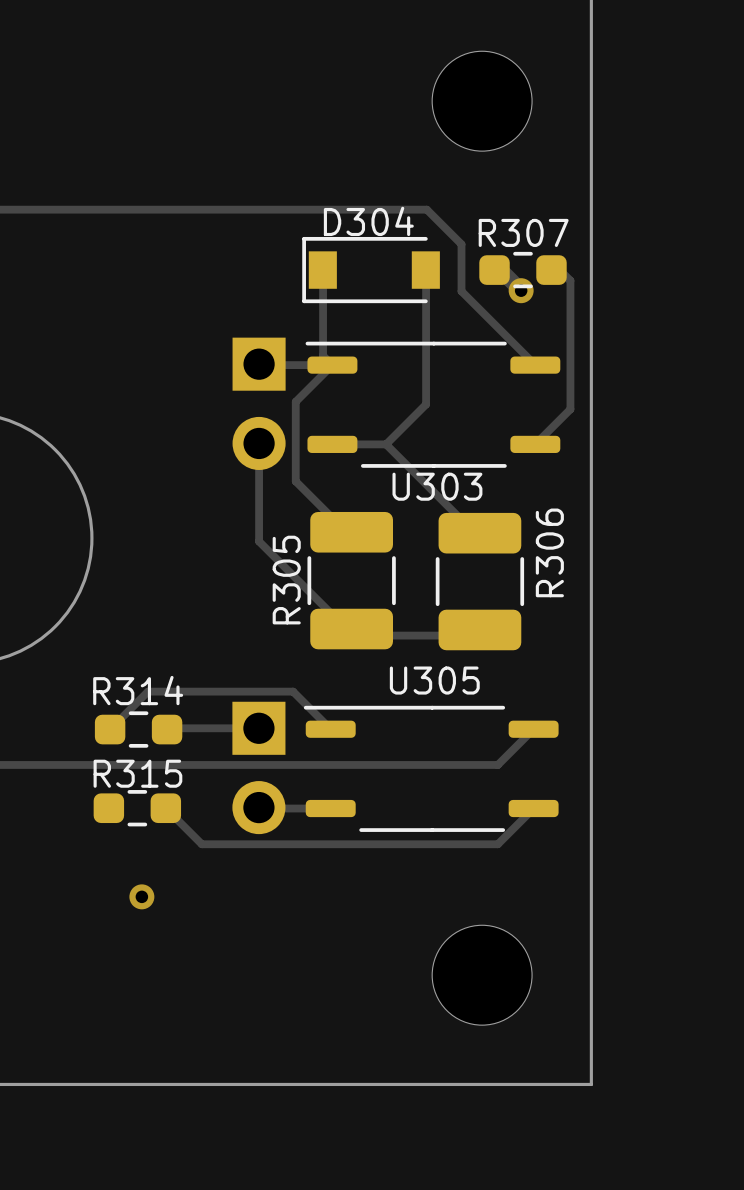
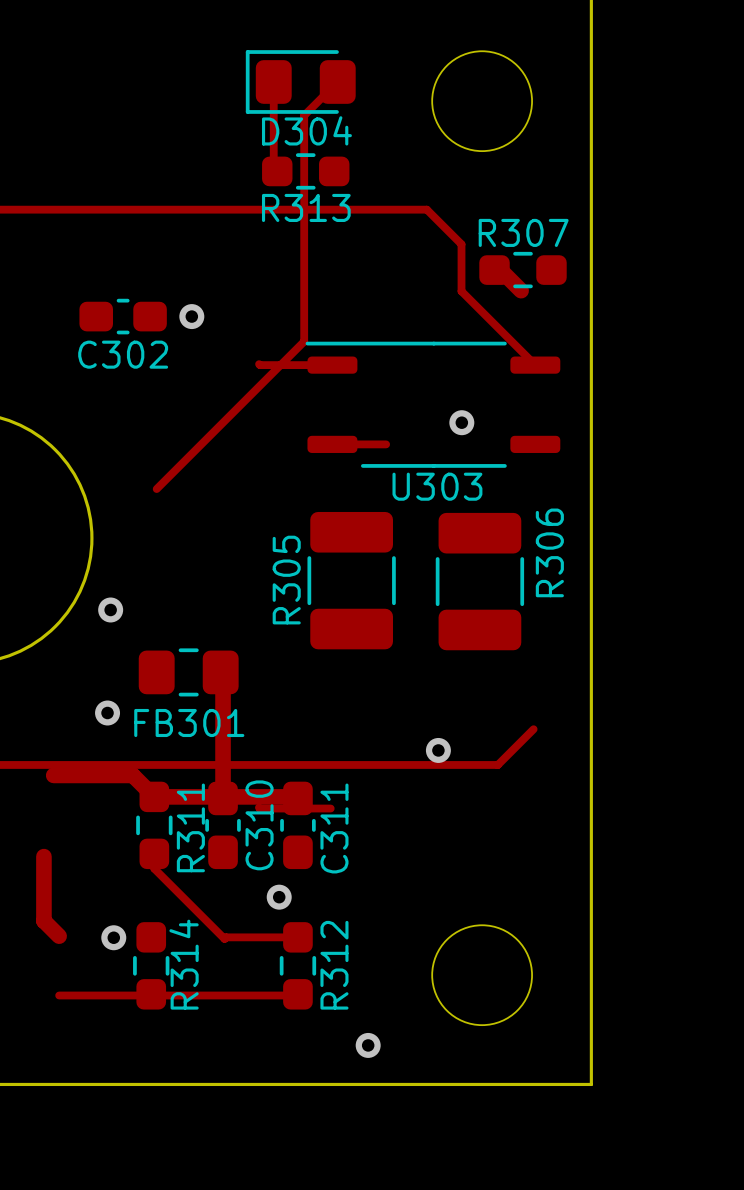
track: none -> (273, 81) (273, 167) (277, 171)
track: none -> (337, 81) (304, 115) (304, 341) (156, 489)
R313: none -> (305, 171)
D304 name position: D304 (368, 221) -> D304 (306, 130)
D304 footprint: [302, 236, 440, 304] -> [245, 50, 356, 114]
track: (323, 261) (323, 355) (332, 365) (295, 401) (295, 481) (352, 537) -> none
track: (426, 261) (426, 404) (386, 444) (480, 538) -> none
track: (551, 261) (570, 280) (570, 409) (535, 444) -> none
via position: (521, 290) -> (461, 422)
C302: none -> (123, 316)
via: none -> (191, 316)
part: (259, 403) -> none
track: (259, 443) (259, 541) (353, 635) (480, 635) -> none
via: none -> (110, 609)
FB301: none -> (188, 672)
track: none -> (223, 674) (223, 798)
via: none -> (107, 713)
track: (258, 728) (167, 729) -> none
R314 rotation: 0° (138, 729) -> 90° clockwise (151, 965)
R314 position: (138, 729) -> (151, 965)
track: (330, 729) (293, 691) (148, 691) (110, 729) -> none
via: none -> (438, 750)
part: (258, 767) -> none
U305: (431, 768) -> none
track: none -> (53, 775) (132, 775) (154, 796) (296, 796) (297, 798)
R315: (137, 808) -> none
track: (165, 808) (201, 844) (497, 844) (533, 808) -> none
R311: none -> (154, 825)
C310: none -> (223, 825)
C311: none -> (297, 825)
track: none -> (154, 853) (154, 868) (224, 938) (226, 937) (297, 937)
track: none -> (43, 856) (43, 920) (59, 936)
via position: (141, 896) -> (113, 937)
via: none -> (279, 897)
R312: none -> (297, 965)
track: none -> (297, 994) (59, 995)
via: none -> (368, 1045)

